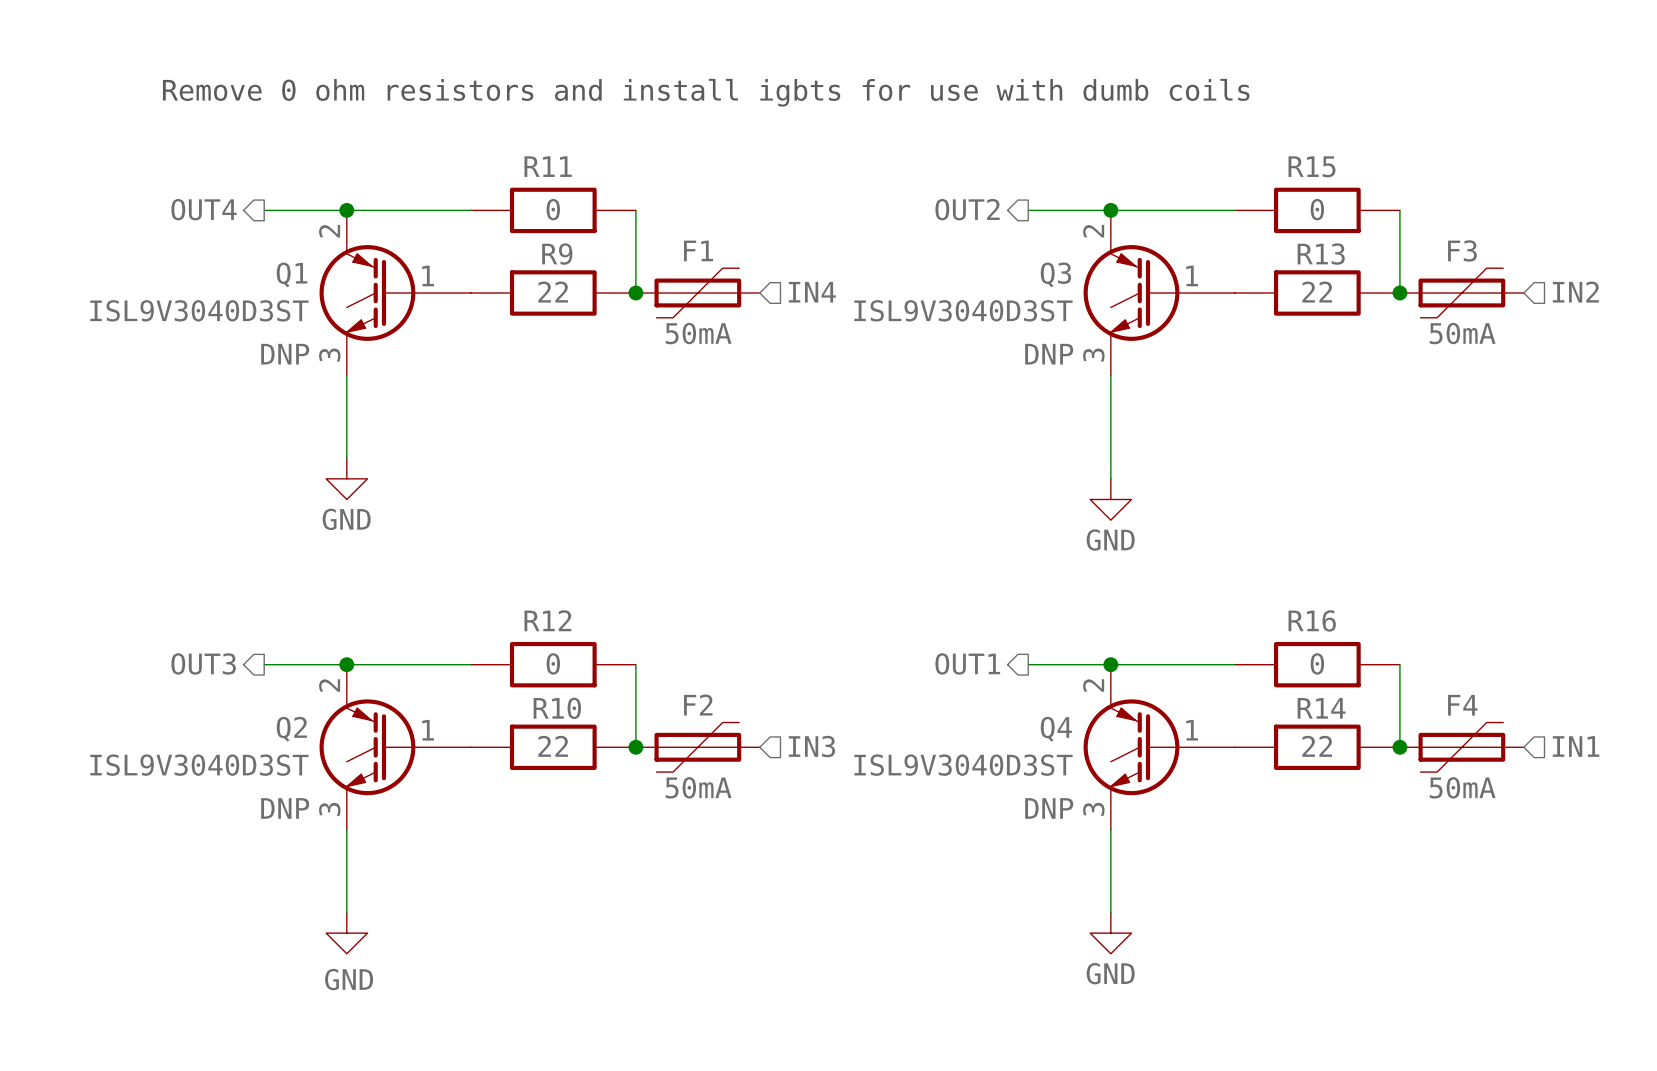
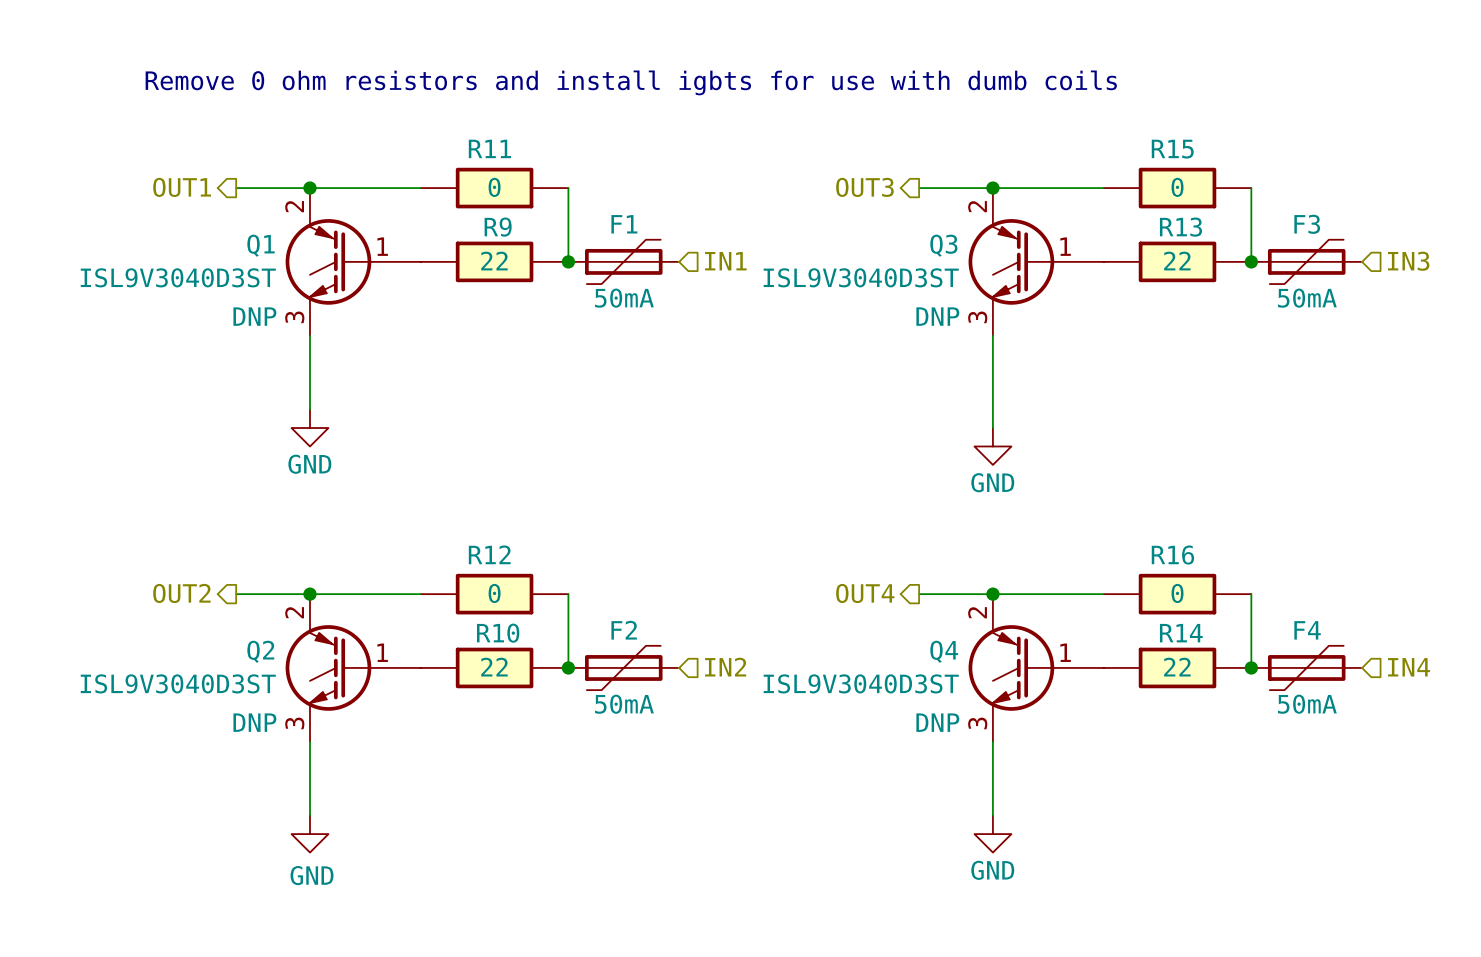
hierarchical label: OUT4 (204, 209) -> OUT1 (182, 187)
hierarchical label: OUT2 (967, 209) -> OUT3 (864, 187)
hierarchical label: IN4 (812, 292) -> IN1 (725, 261)
hierarchical label: IN2 (1575, 292) -> IN3 (1408, 261)
hierarchical label: OUT3 (203, 663) -> OUT2 (181, 593)
hierarchical label: OUT1 (967, 663) -> OUT4 (865, 593)
hierarchical label: IN3 (811, 746) -> IN2 (725, 667)
hierarchical label: IN1 (1576, 746) -> IN4 (1409, 667)

